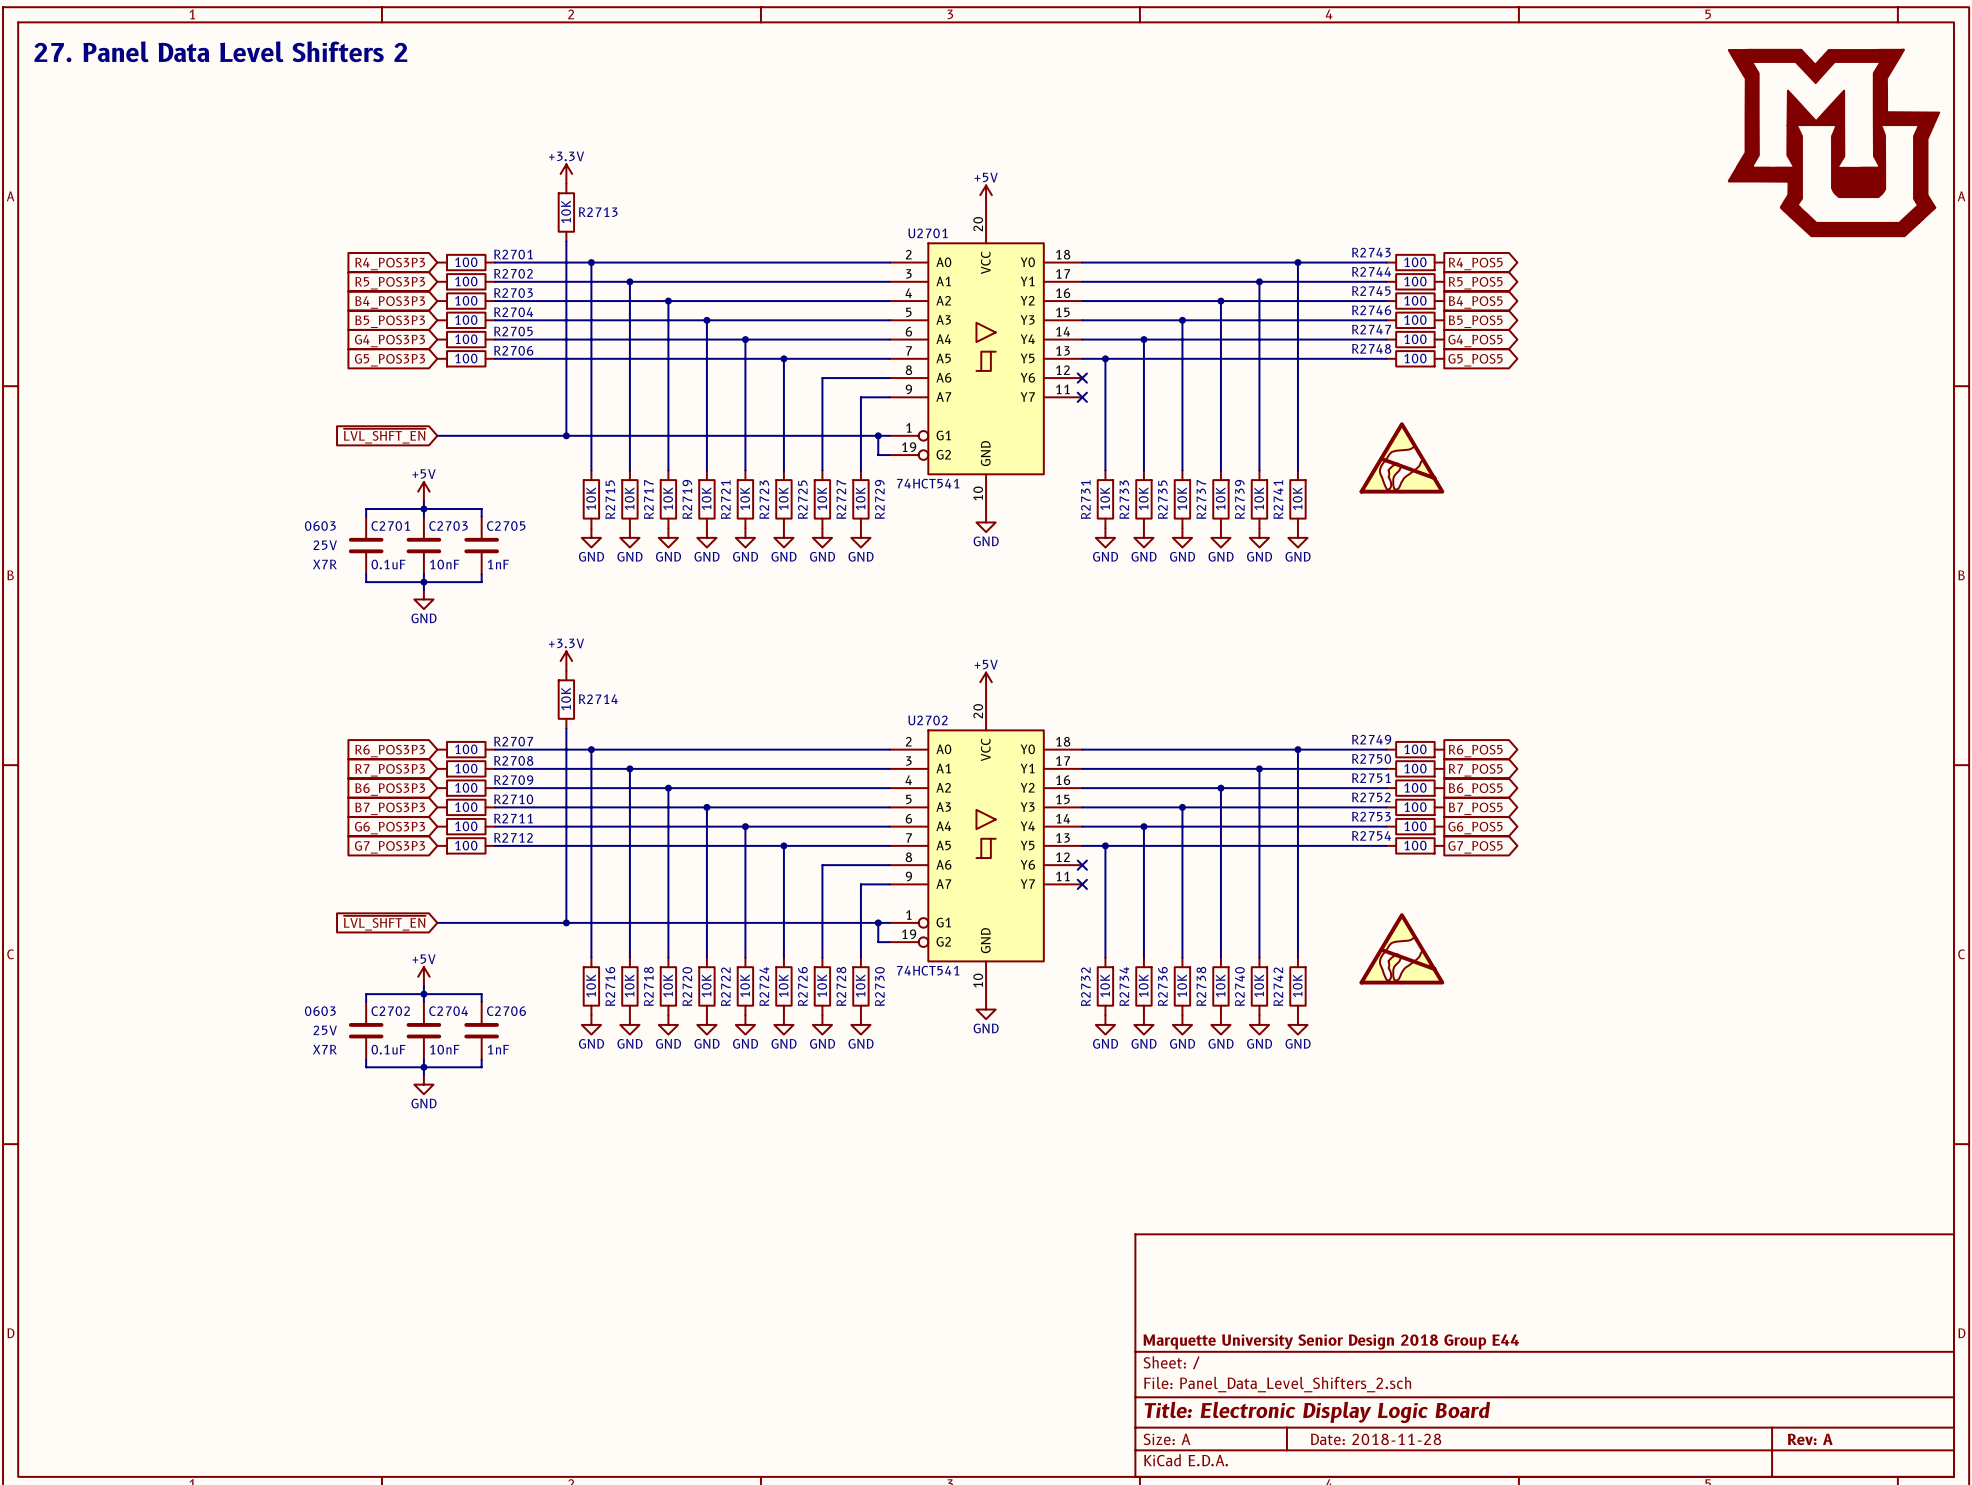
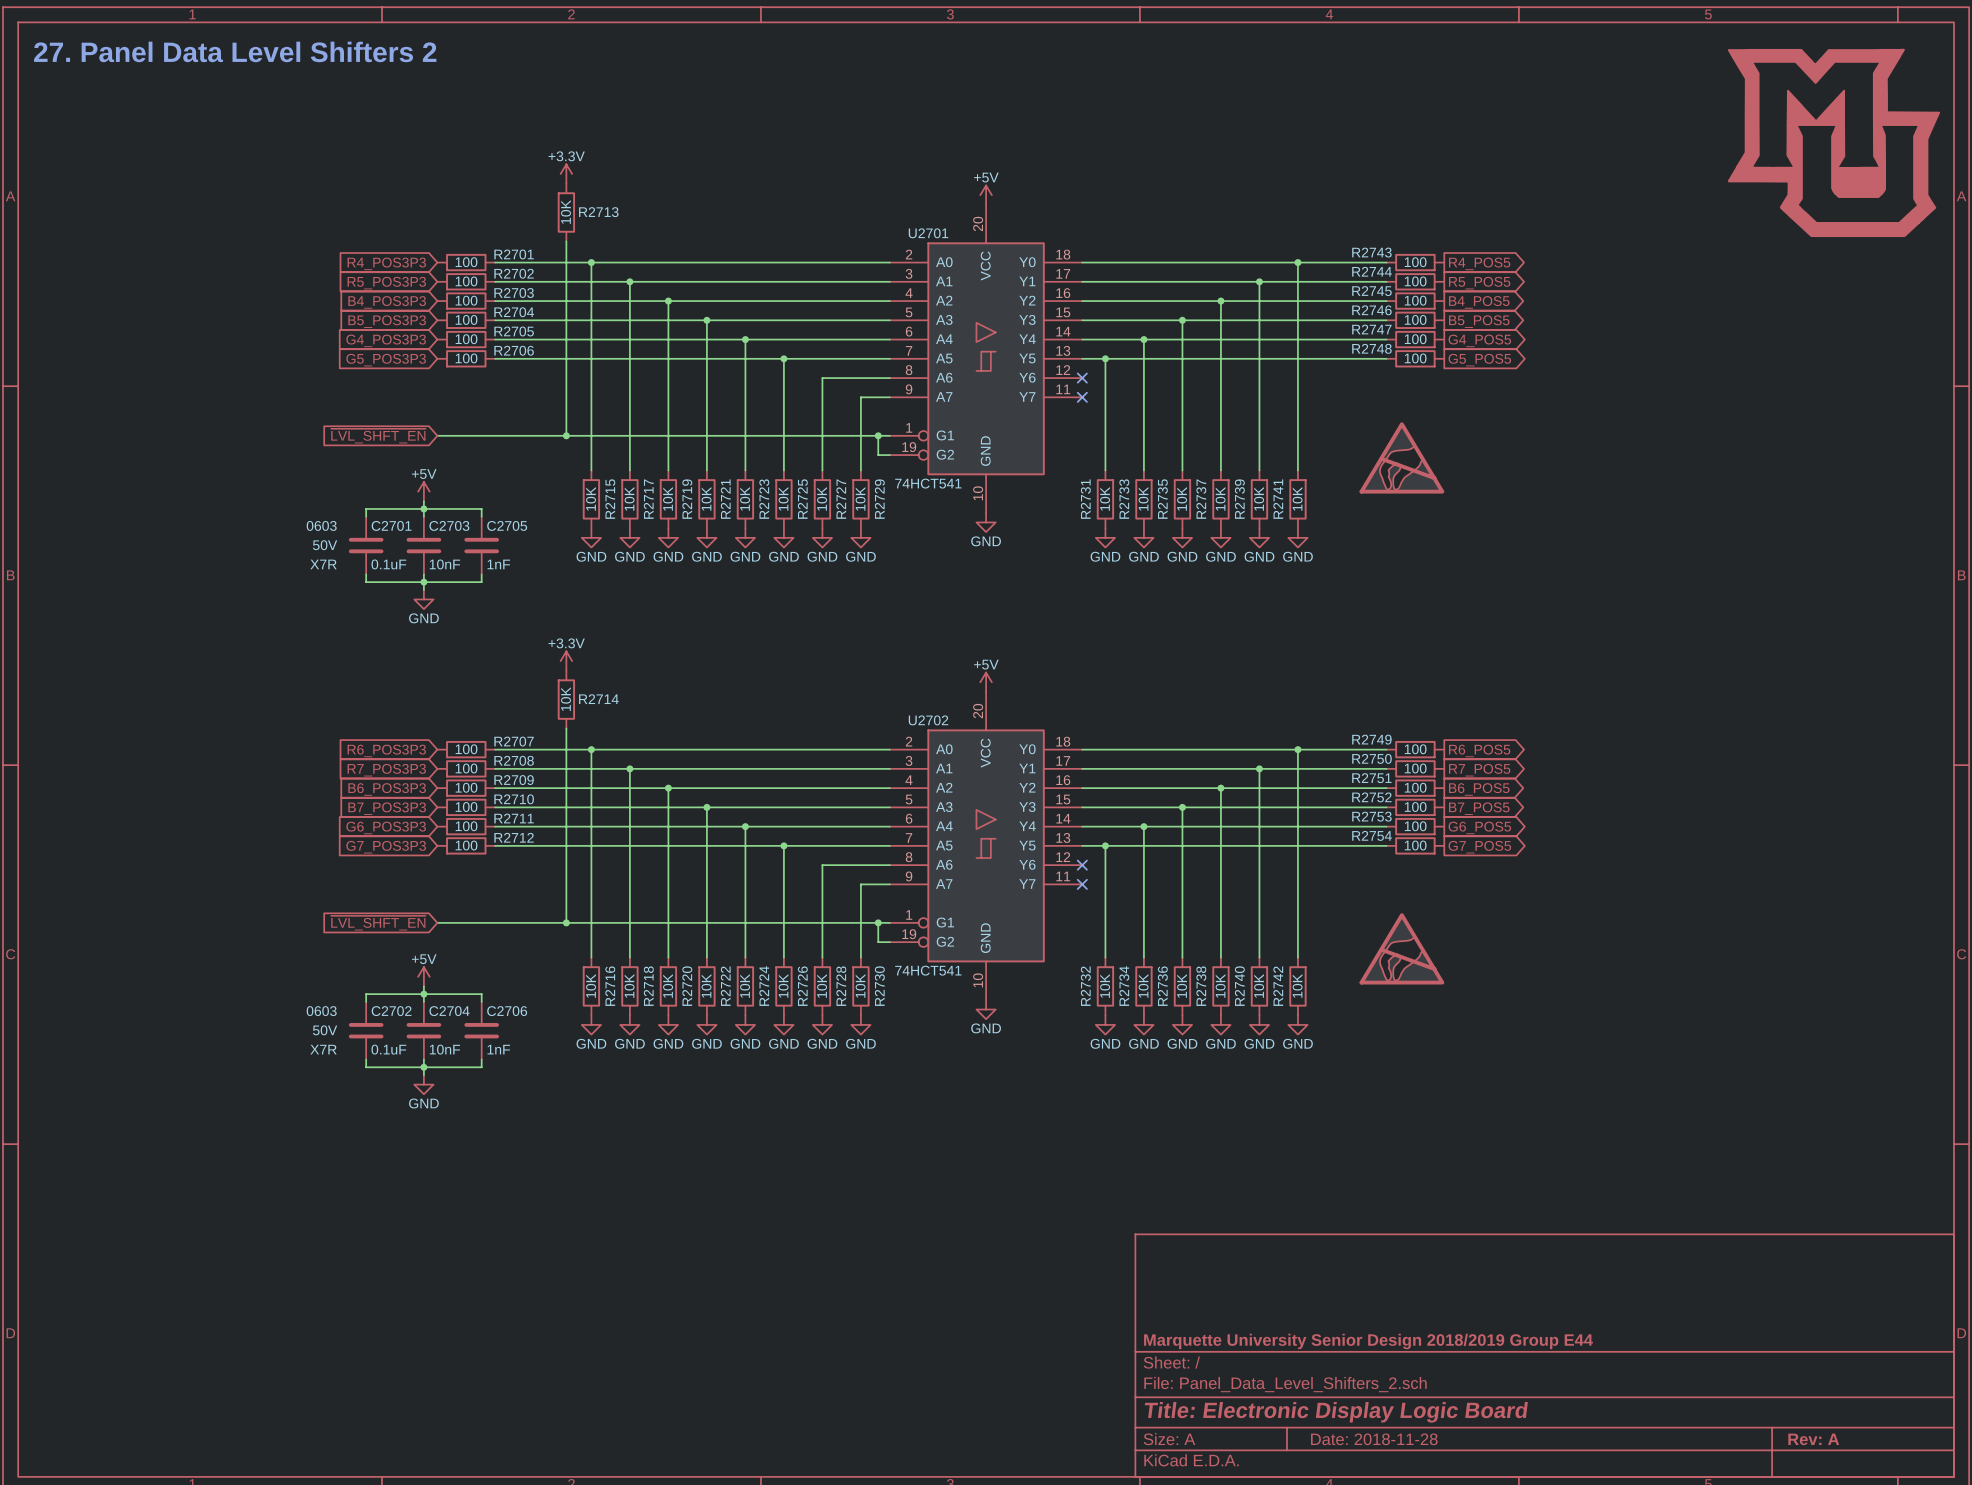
C2701 text: 25V (325, 545) -> 50V (325, 545)
C2702 text: 25V (325, 1030) -> 50V (325, 1030)
title block: Marquette University Senior Design 2018 Group E44 (1331, 1341) -> Marquette University Senior Design 2018/2019 Group E44 (1368, 1341)

